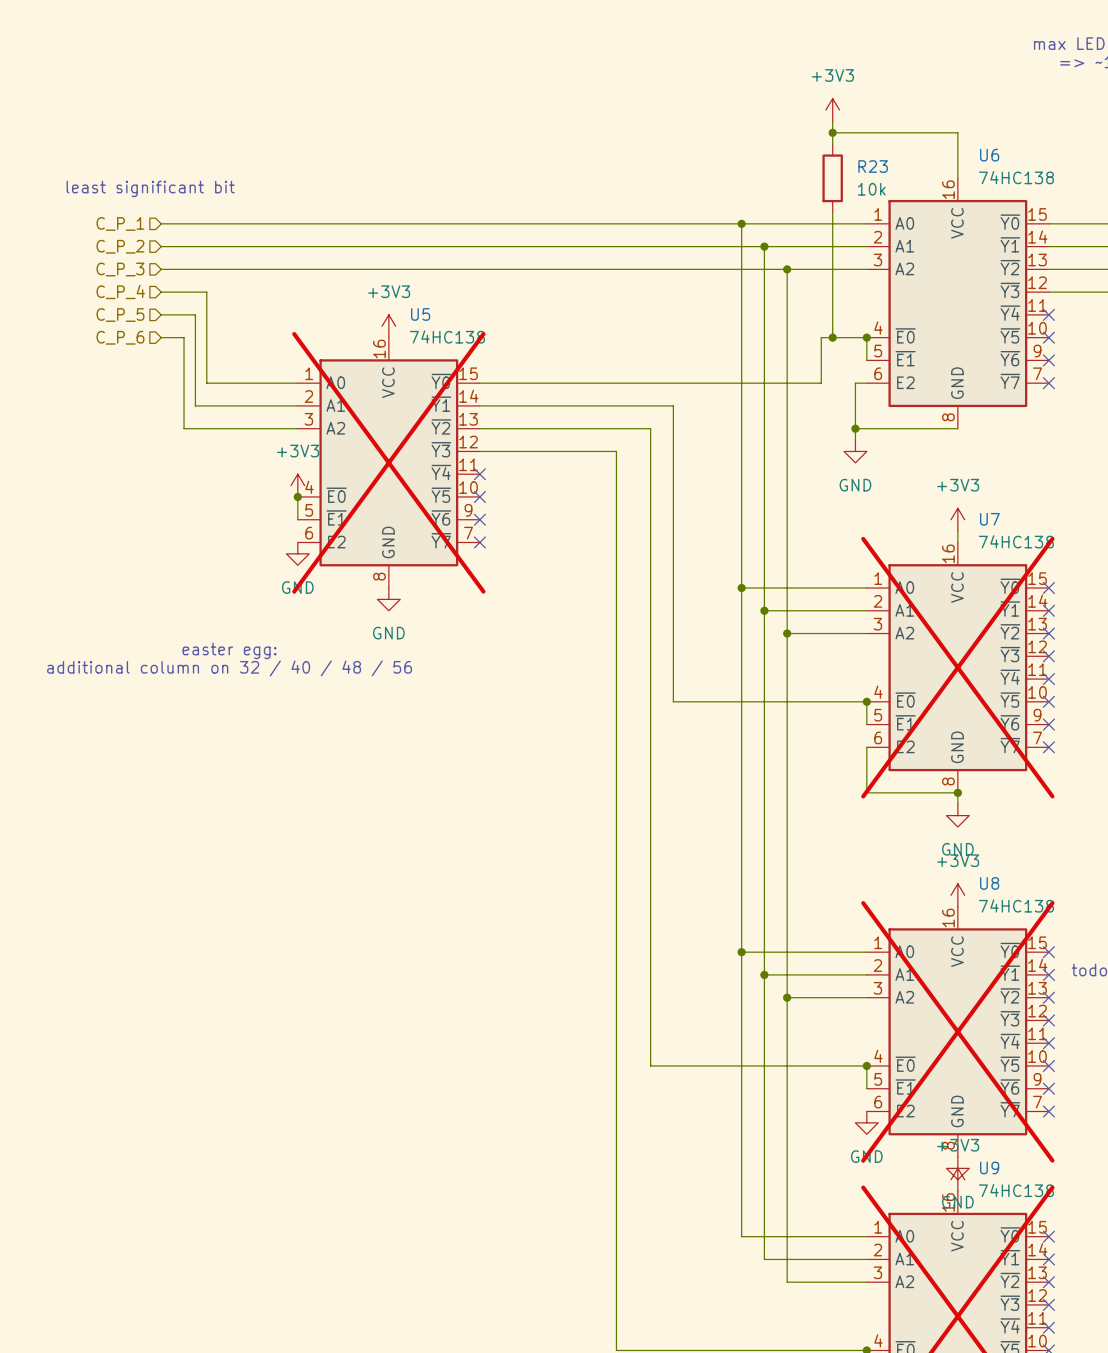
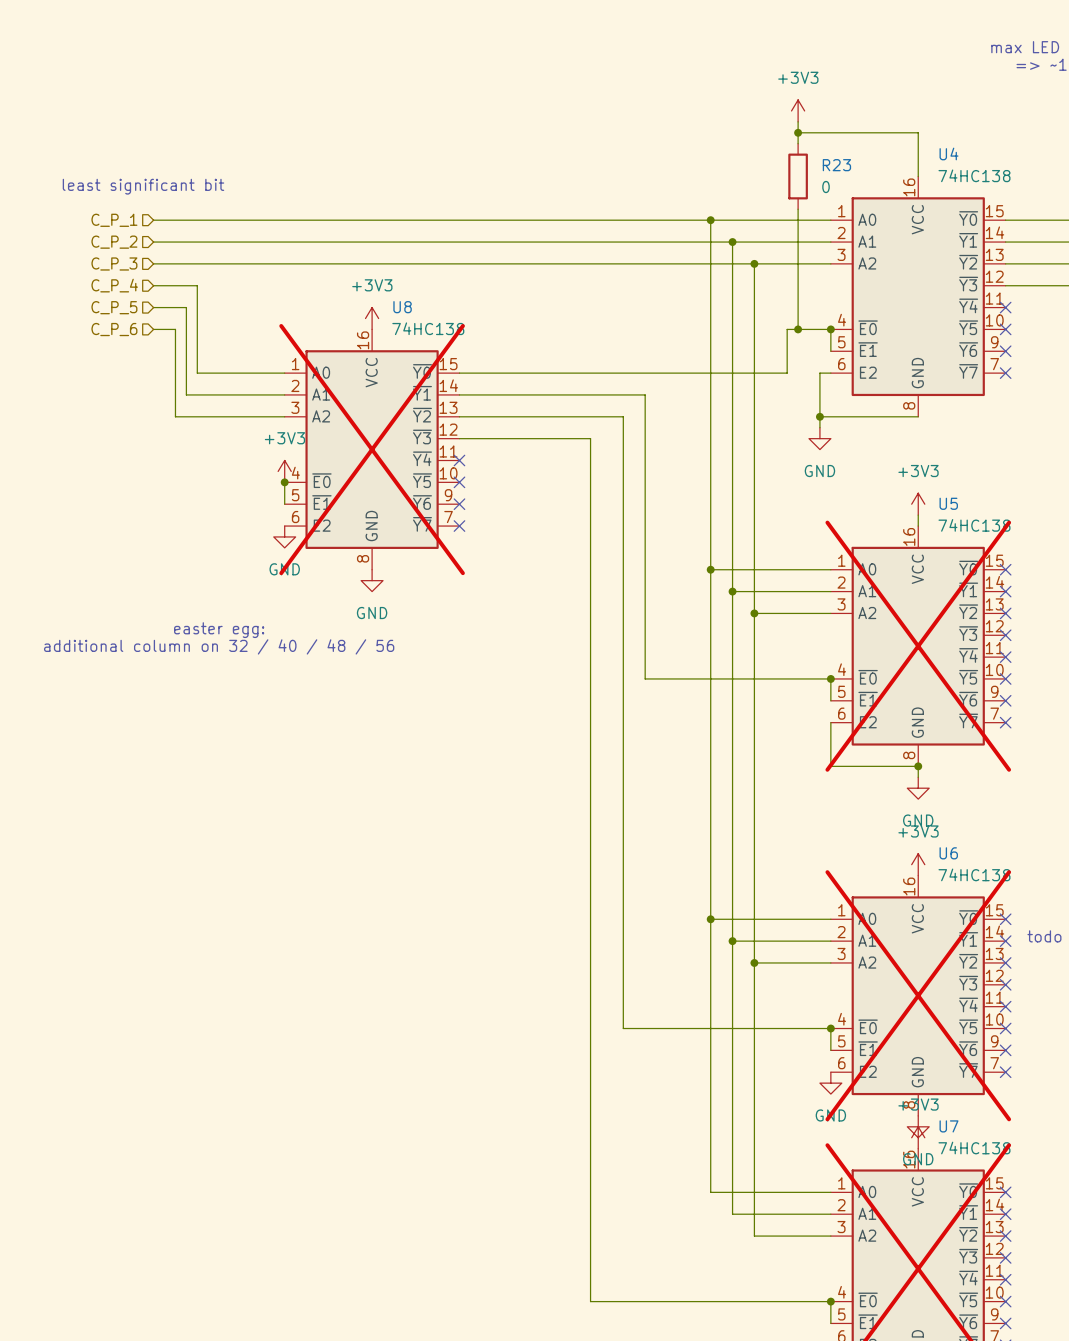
U6 name: U6 (989, 155) -> U4 (948, 153)
R23 value: 10k (871, 189) -> 0 (826, 187)
U5 name: U5 (420, 314) -> U8 (402, 307)
U7 name: U7 (989, 519) -> U5 (948, 503)
U8 name: U8 (989, 883) -> U6 (948, 853)
U9 name: U9 (989, 1167) -> U7 (948, 1126)

